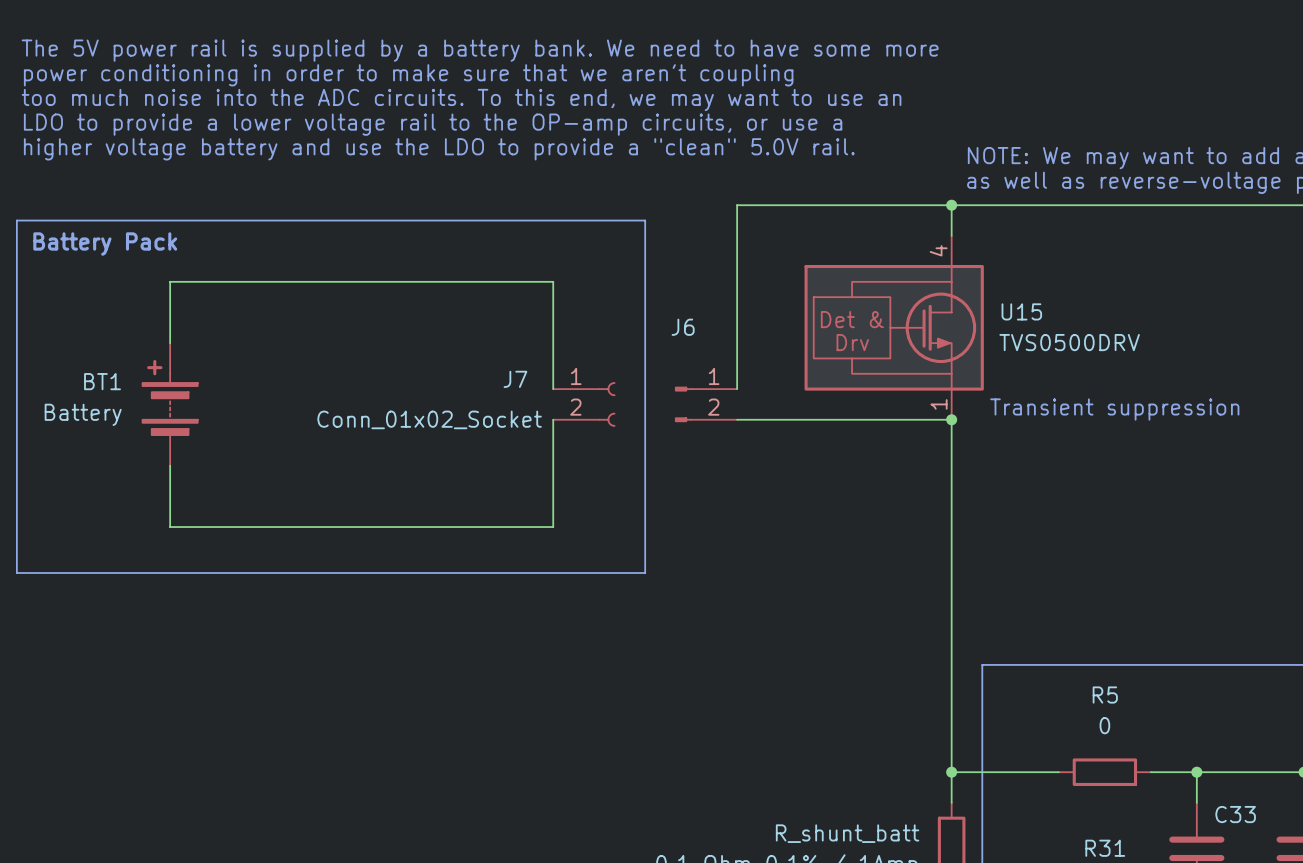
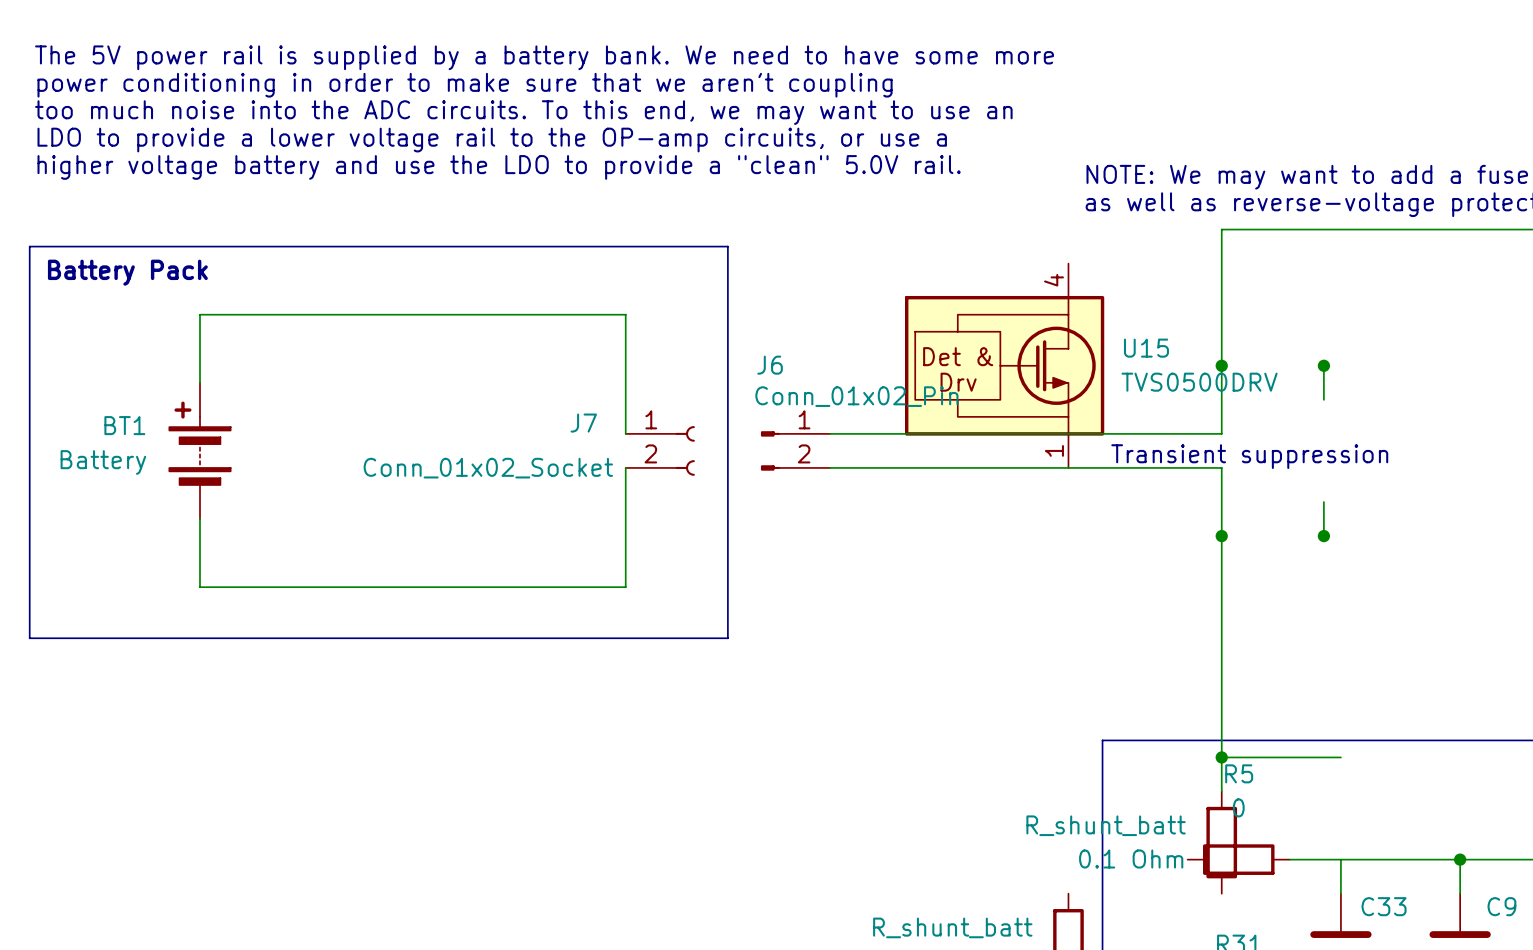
wire: (951, 205) (951, 235) -> (1323, 365) (1323, 399)
junction: (951, 205) -> none
wire: (1089, 205) (737, 205) (737, 389) -> (1221, 229) (1221, 433) (830, 433)
junction: none -> (1221, 365)
junction: none -> (1323, 365)
J6 value: none -> Conn_01x02_Pin (856, 396)
wire: (951, 419) (951, 802) -> (1068, 467) (1221, 467) (1221, 791)
junction: (951, 419) -> none
wire: none -> (1323, 502) (1323, 536)
junction: none -> (1221, 536)
junction: none -> (1323, 536)
junction: none -> (1221, 757)
R_shunt_batt: none -> 0.1 Ohm (1221, 842)
wire: (951, 772) (1058, 772) -> (1221, 757) (1340, 757)
junction: (951, 772) -> none
junction: (1196, 772) -> none

